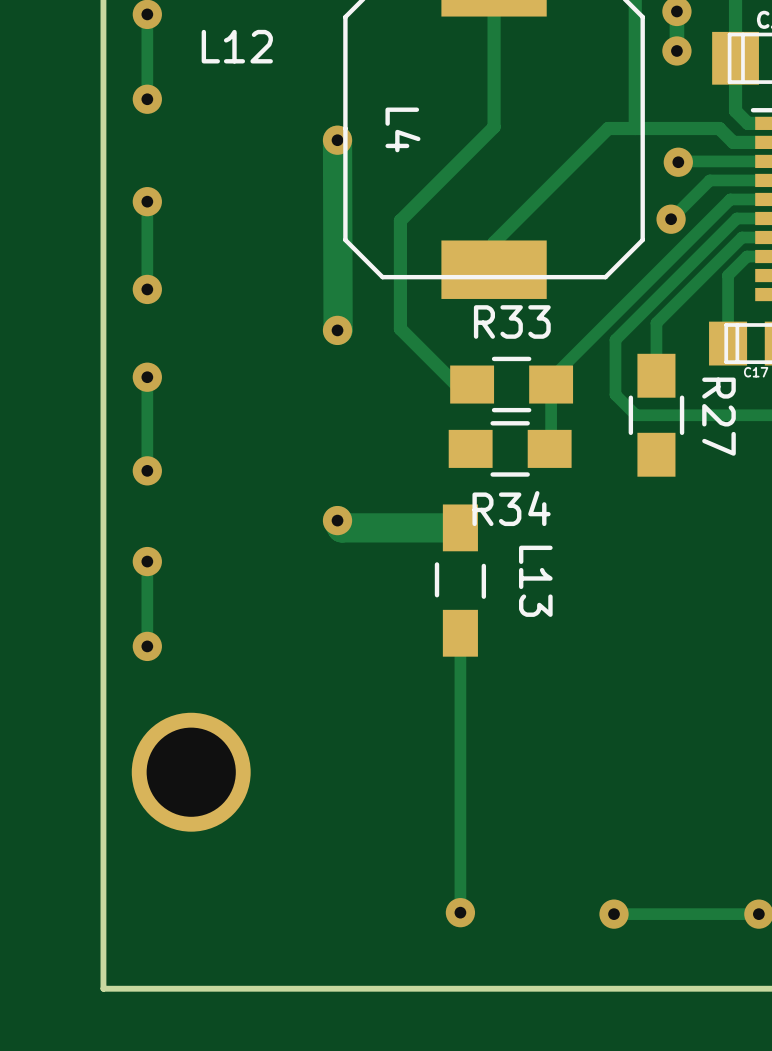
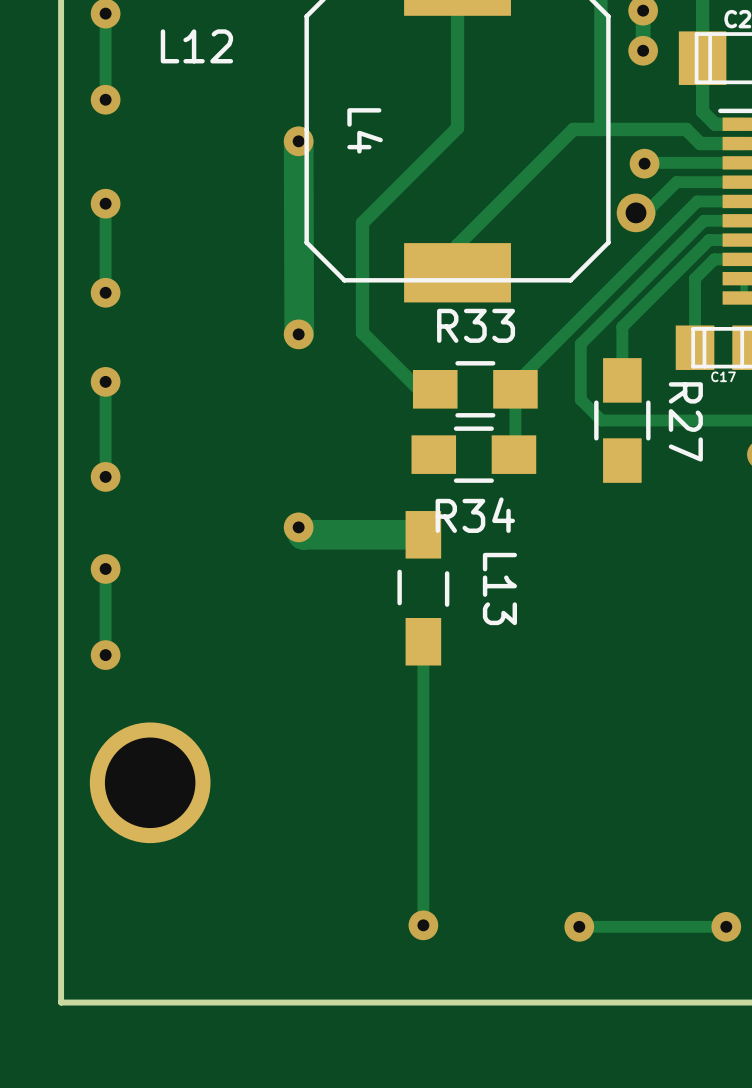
via size: [656, 204, 686, 234] -> [616, 193, 656, 233]

